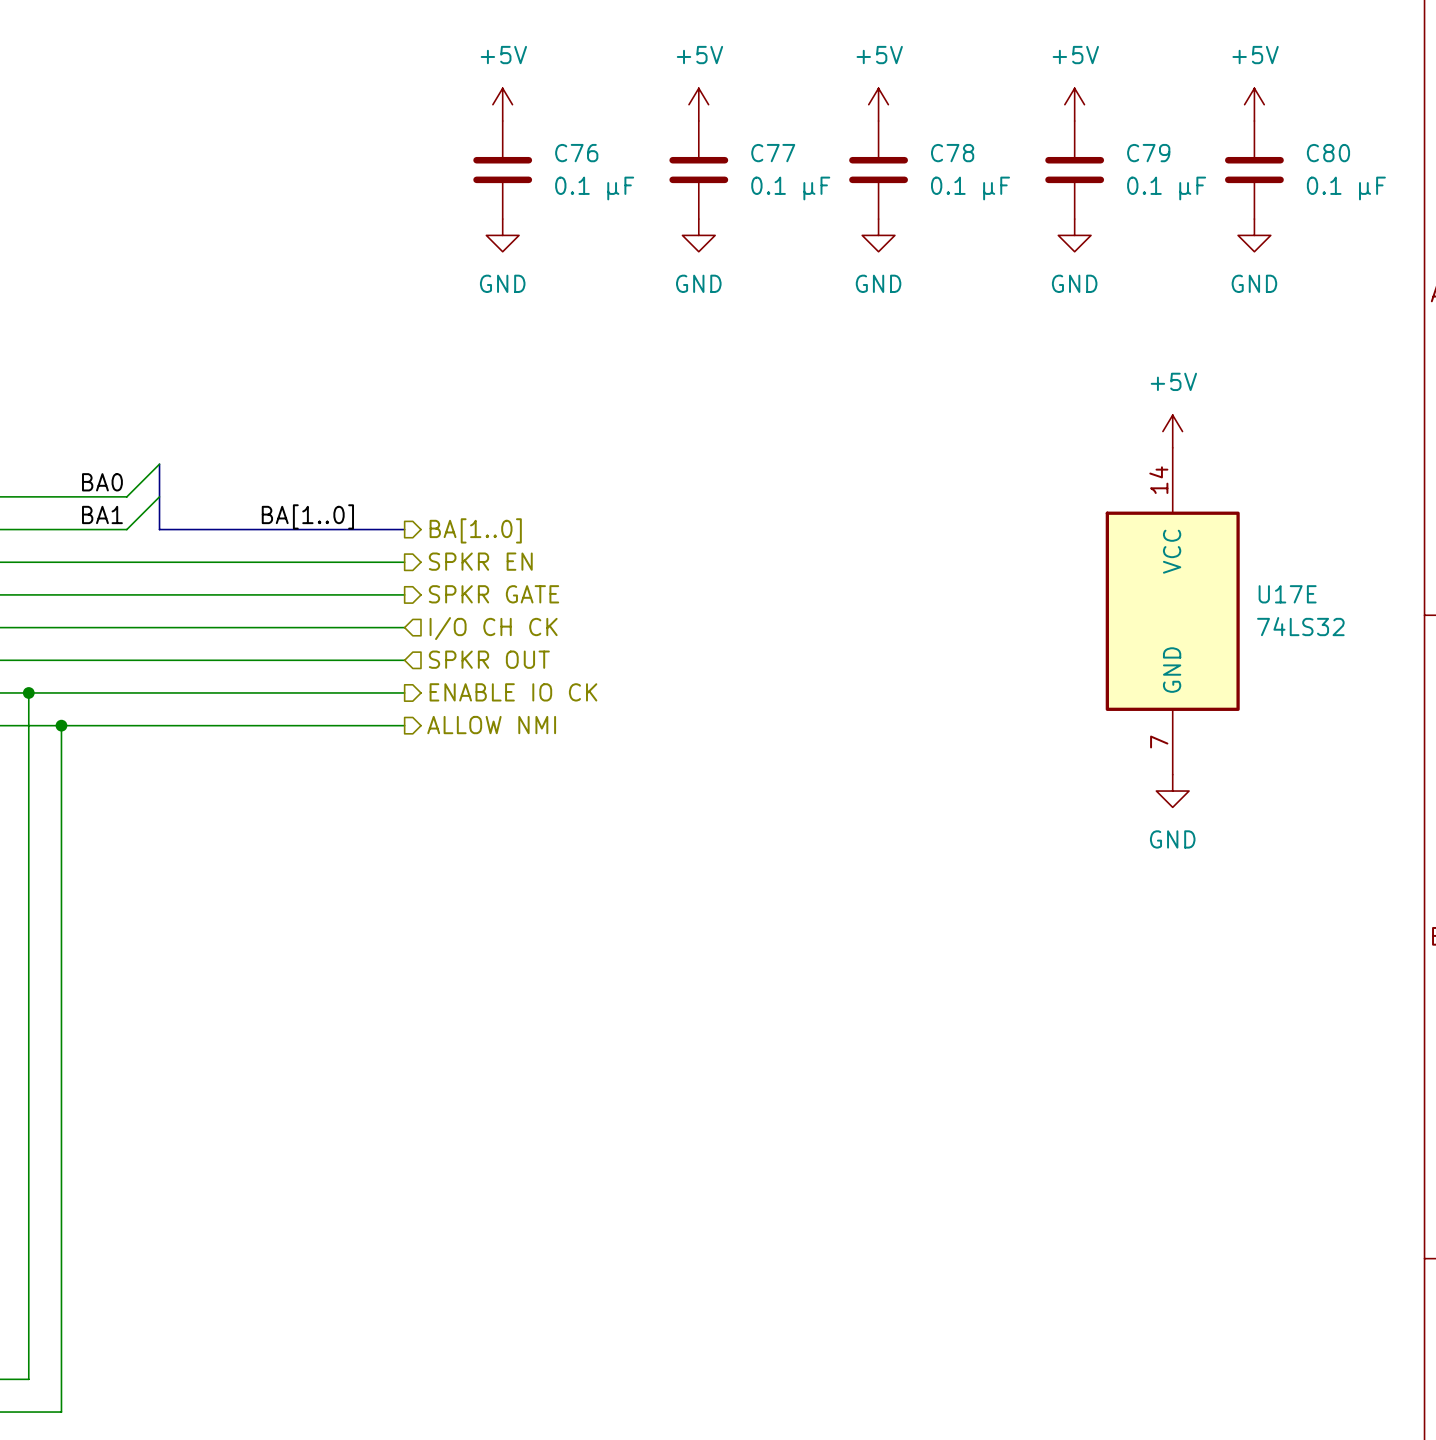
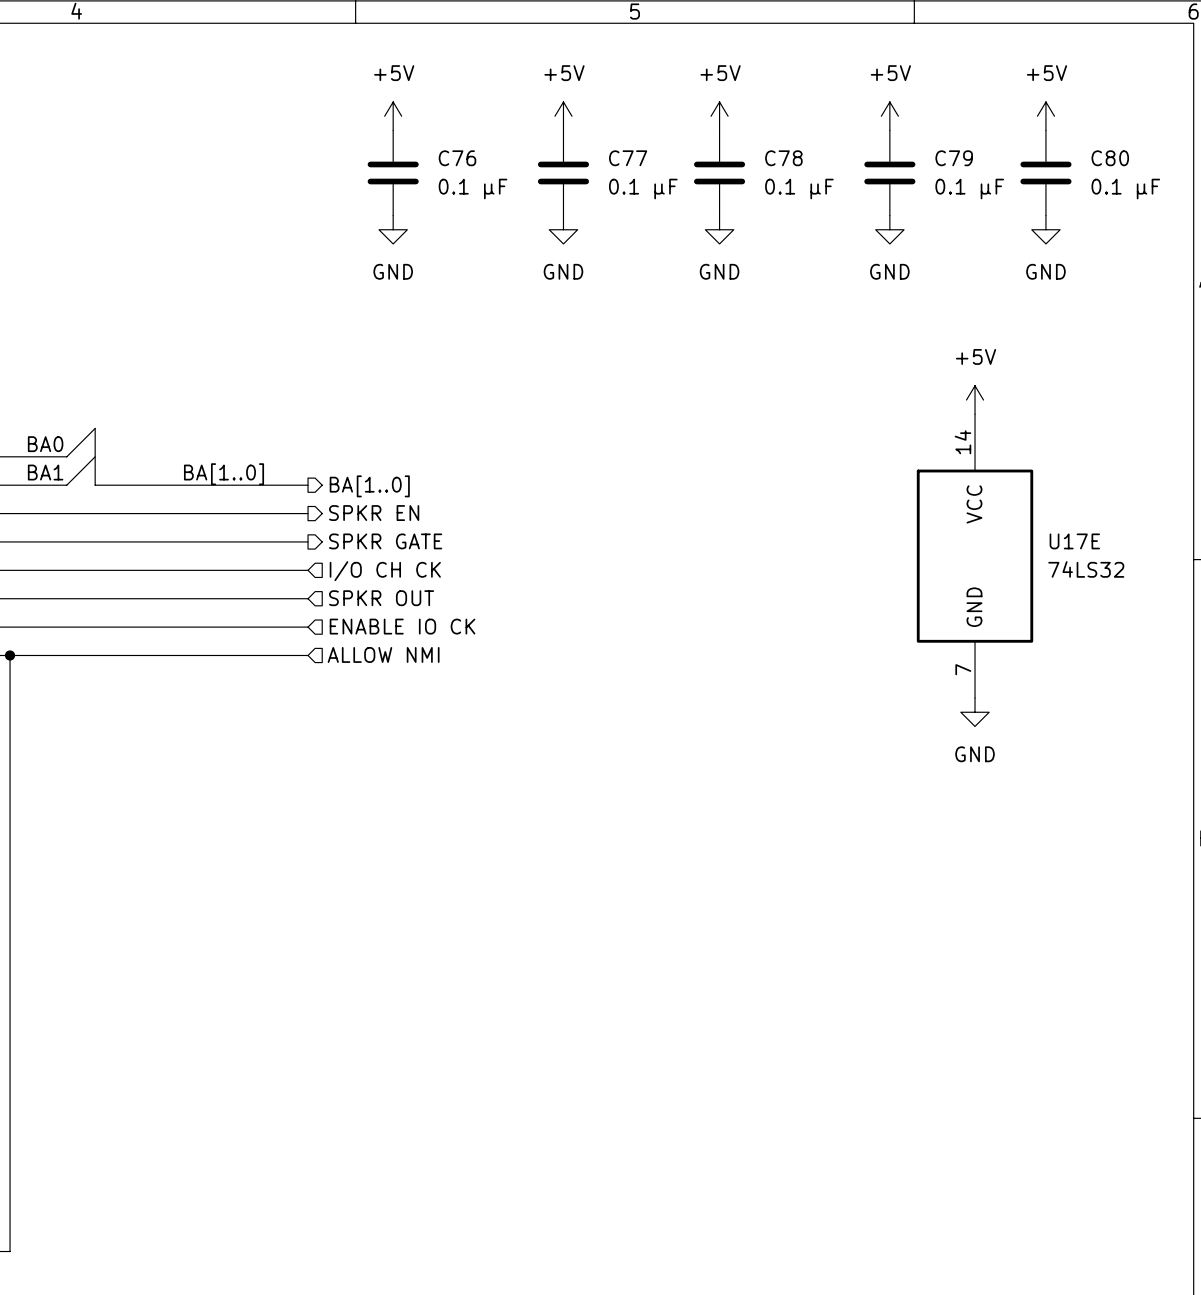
hierarchical label shape: output (513, 692) -> input (402, 626)
hierarchical label shape: output (491, 725) -> input (383, 654)

